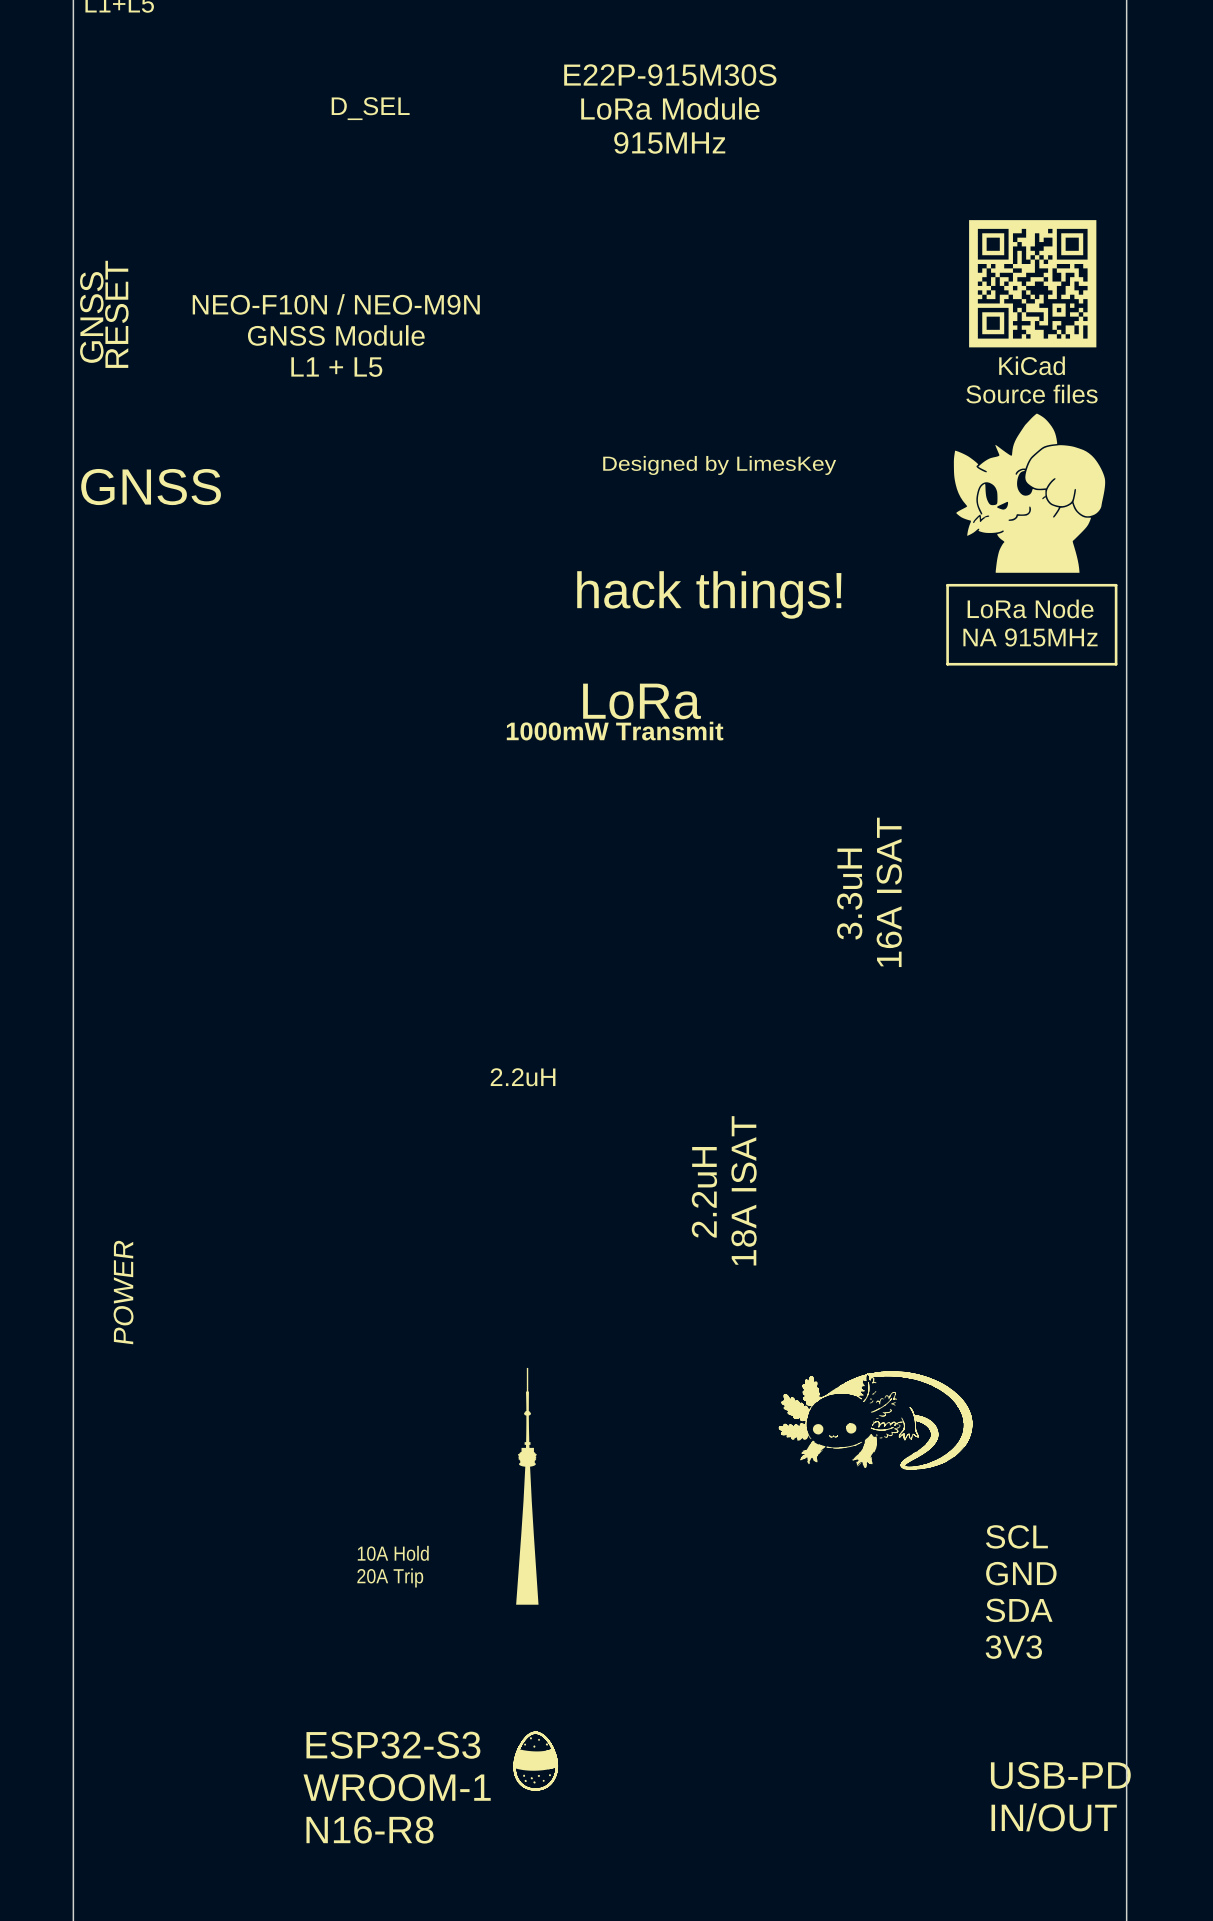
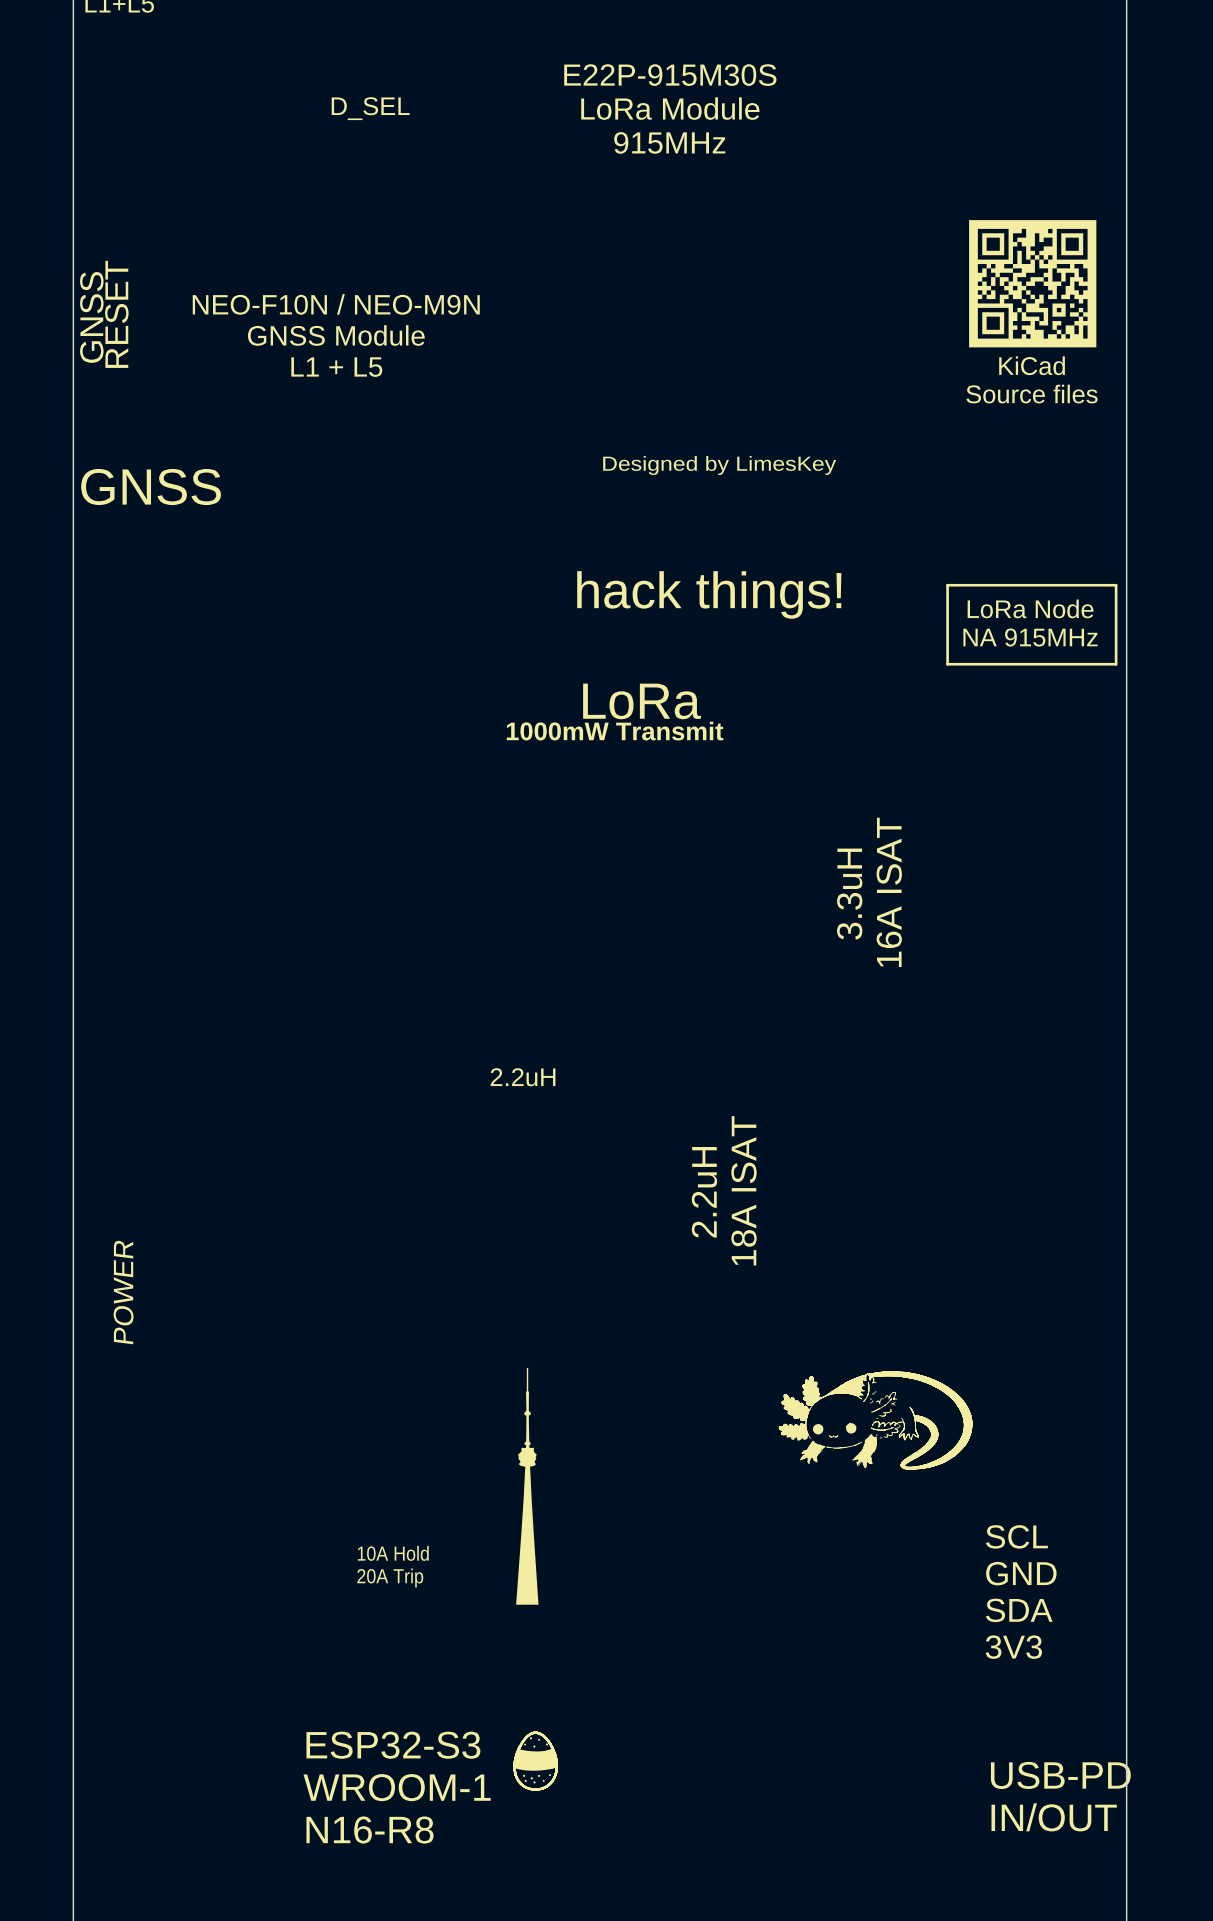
drawing: [953, 413, 1106, 573] -> none

